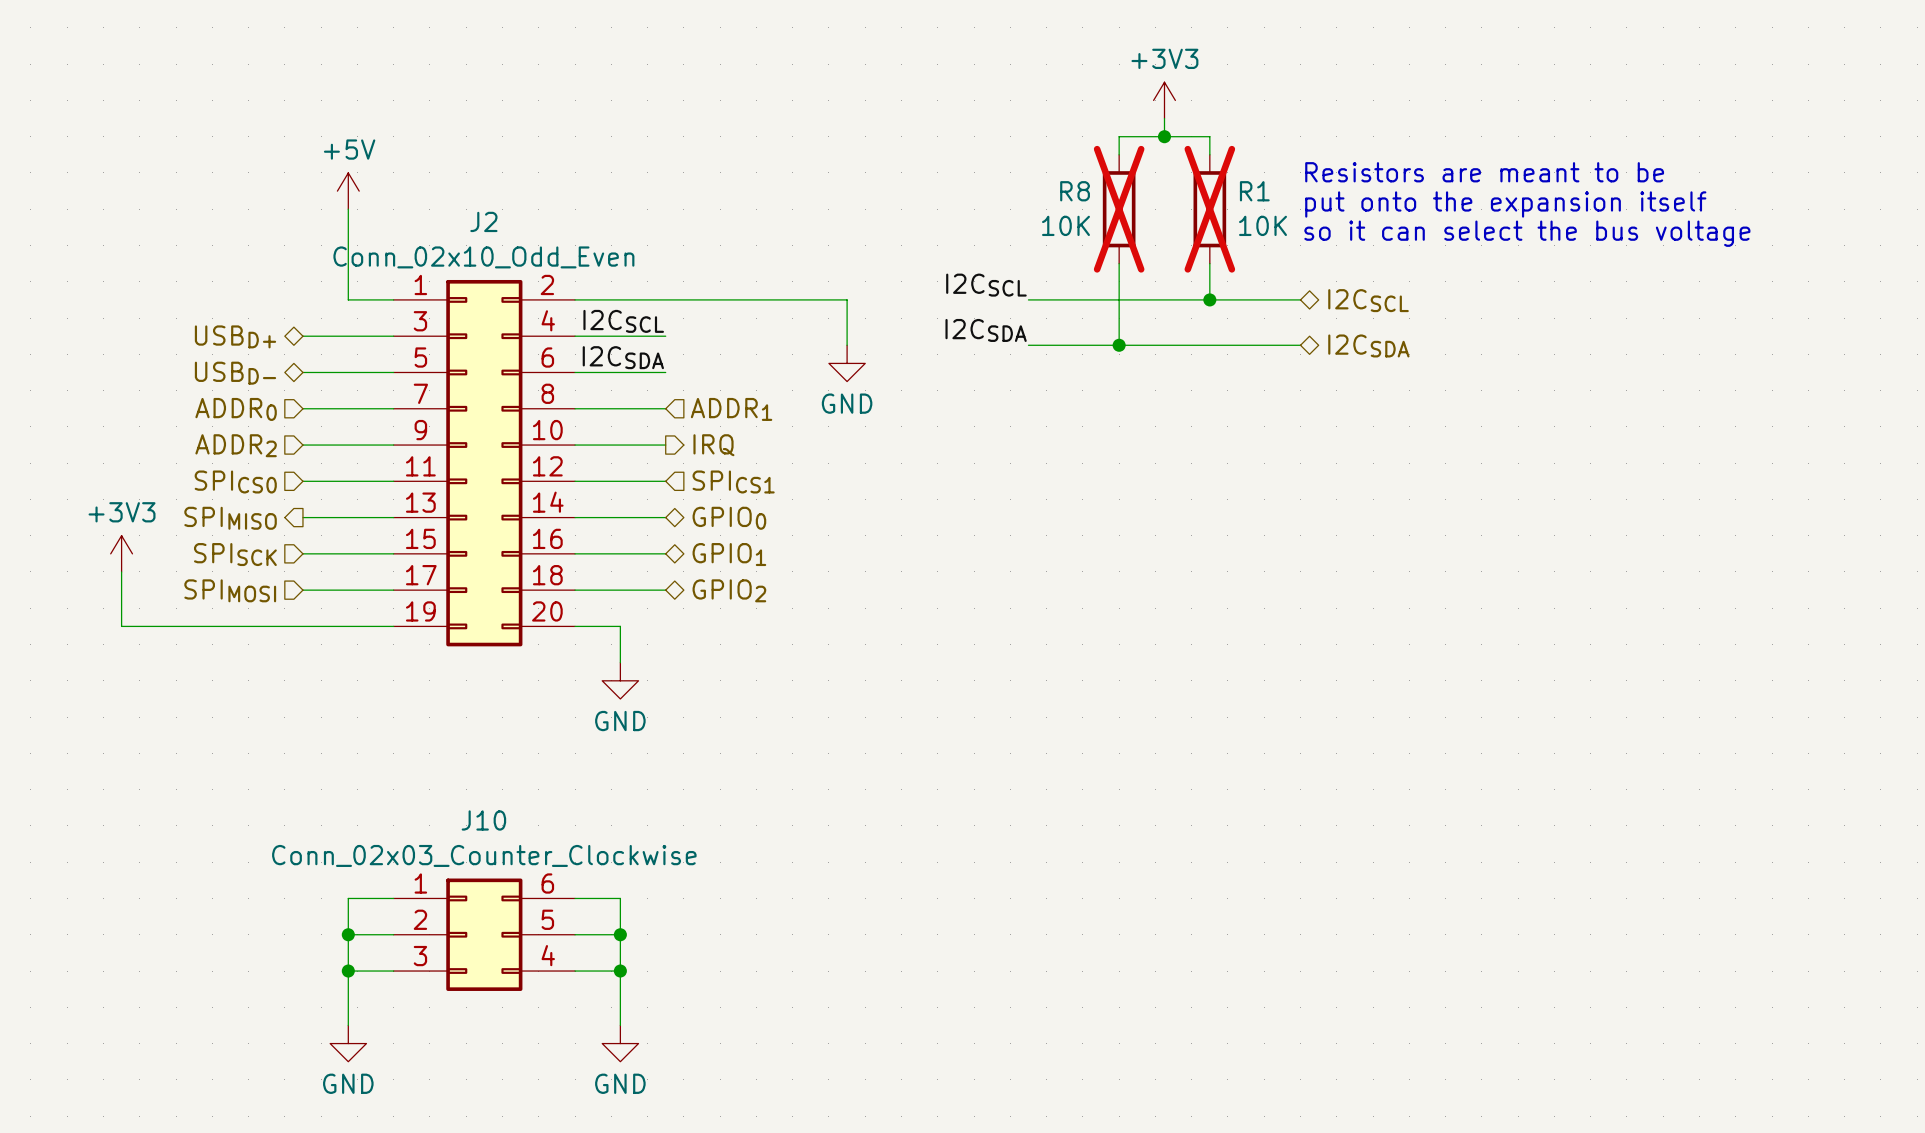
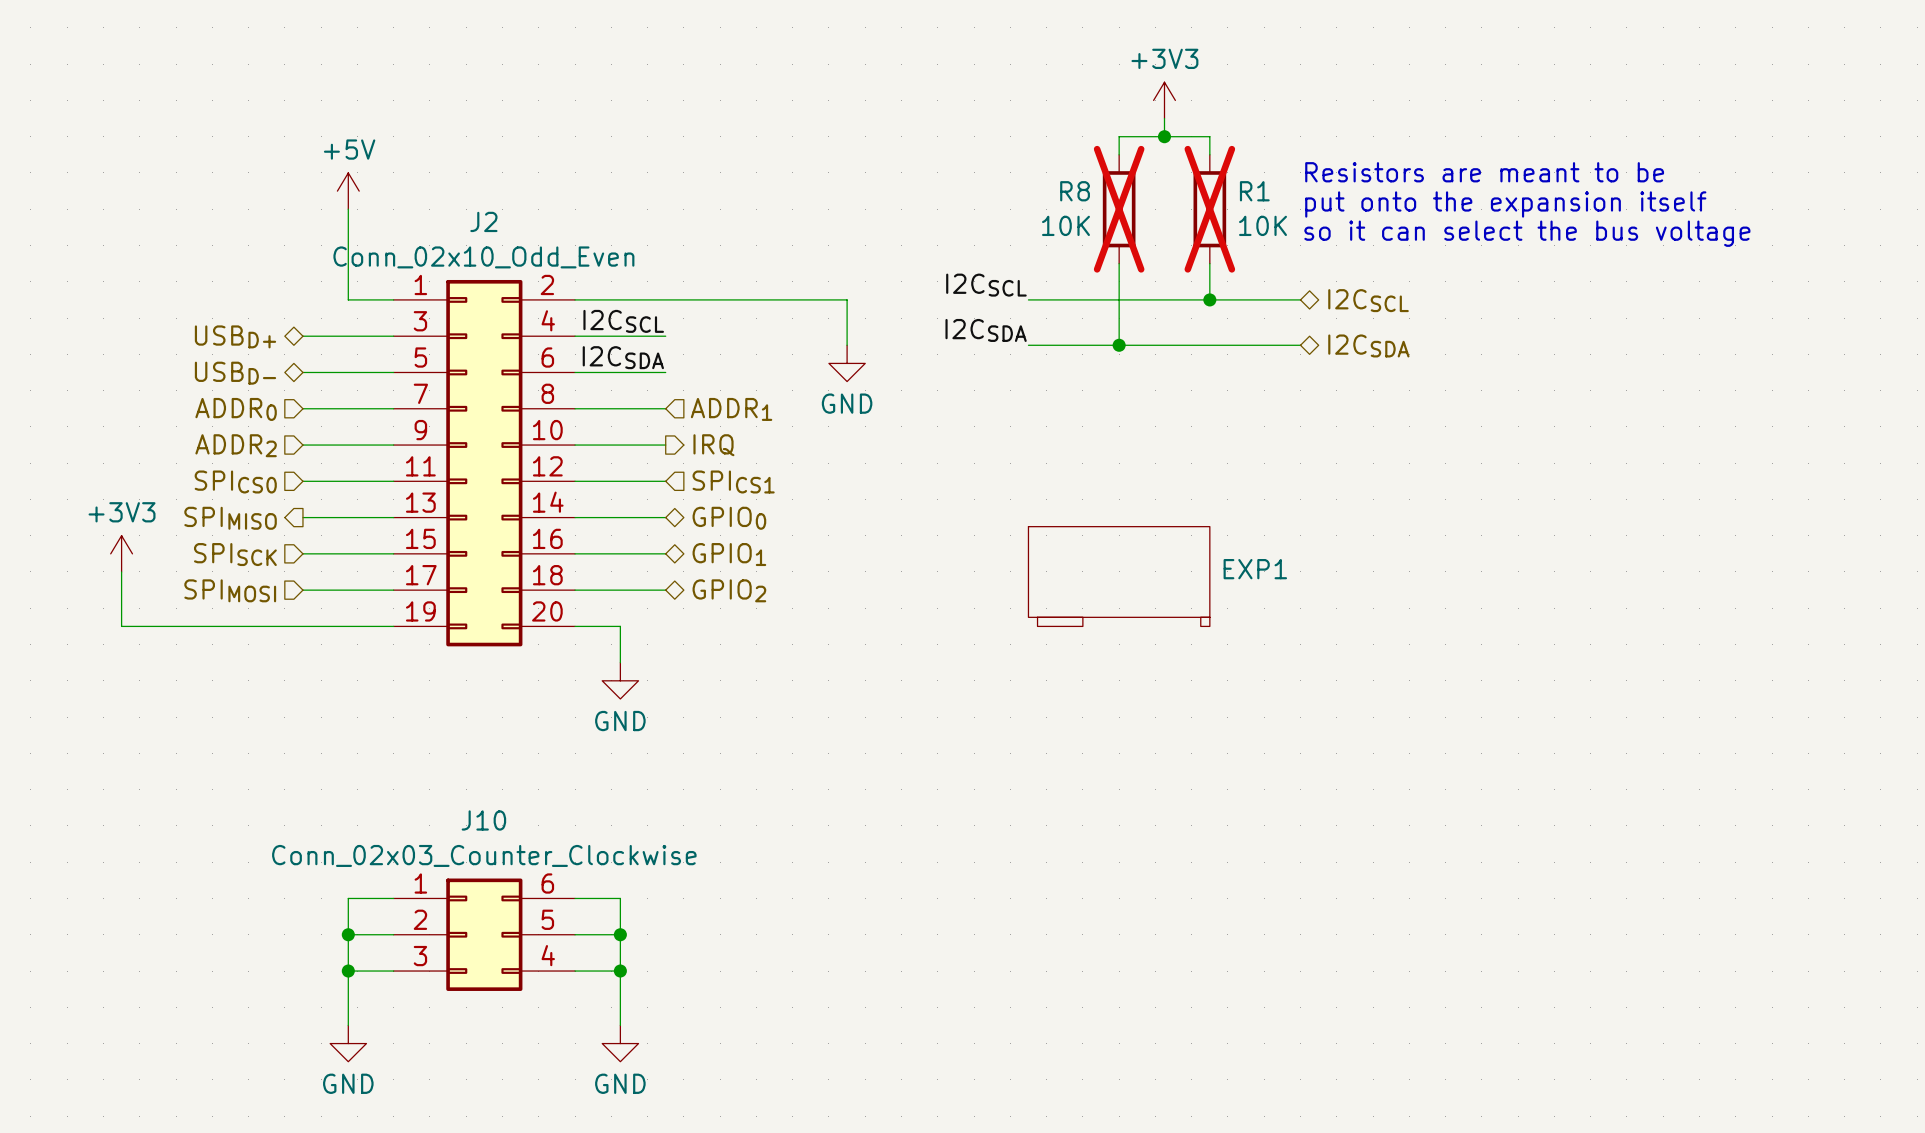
EXP1: none -> (1119, 576)

